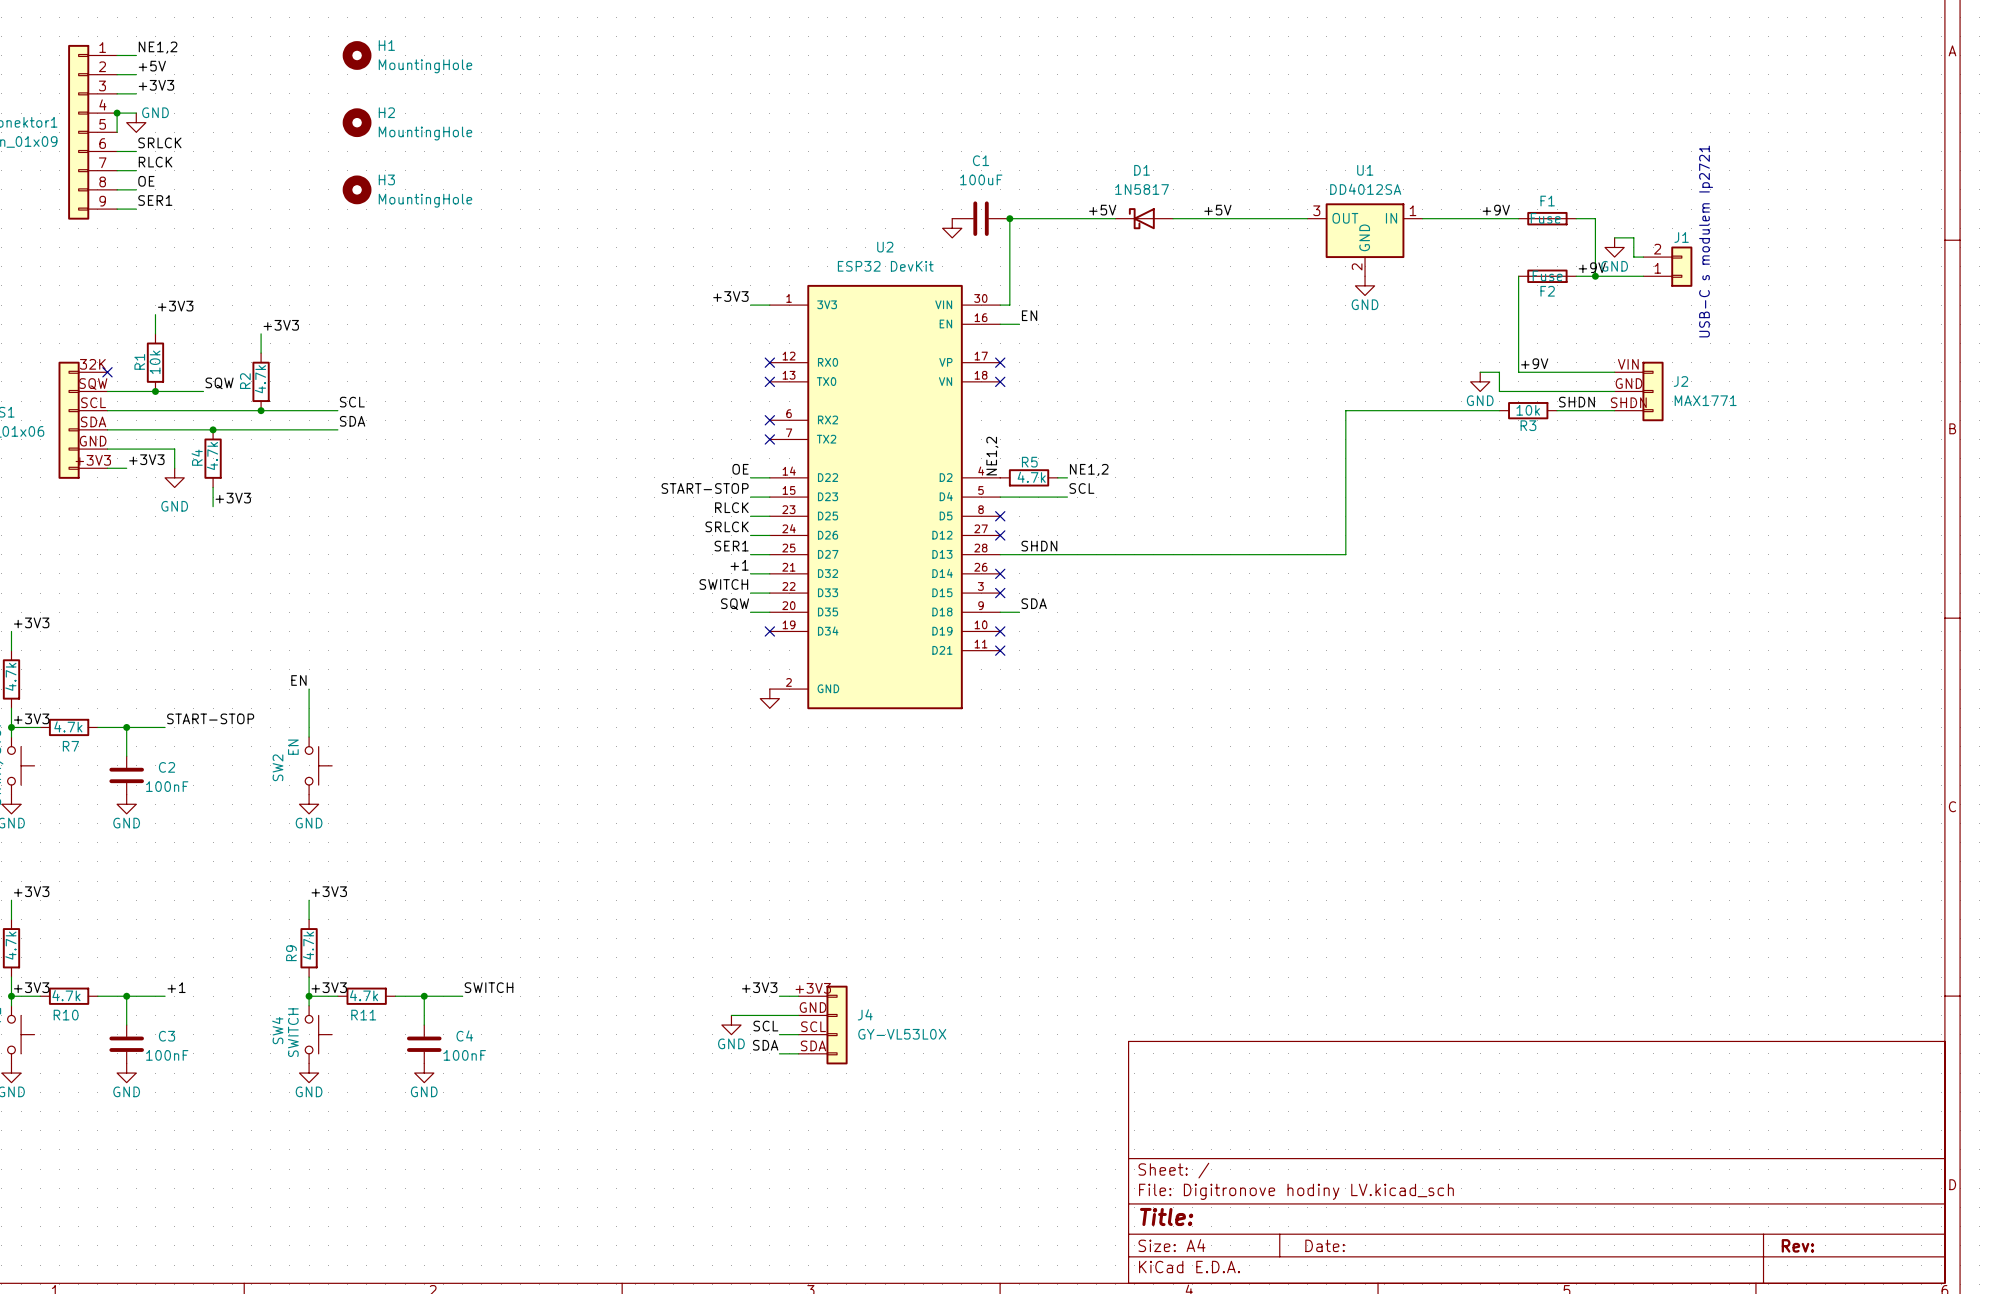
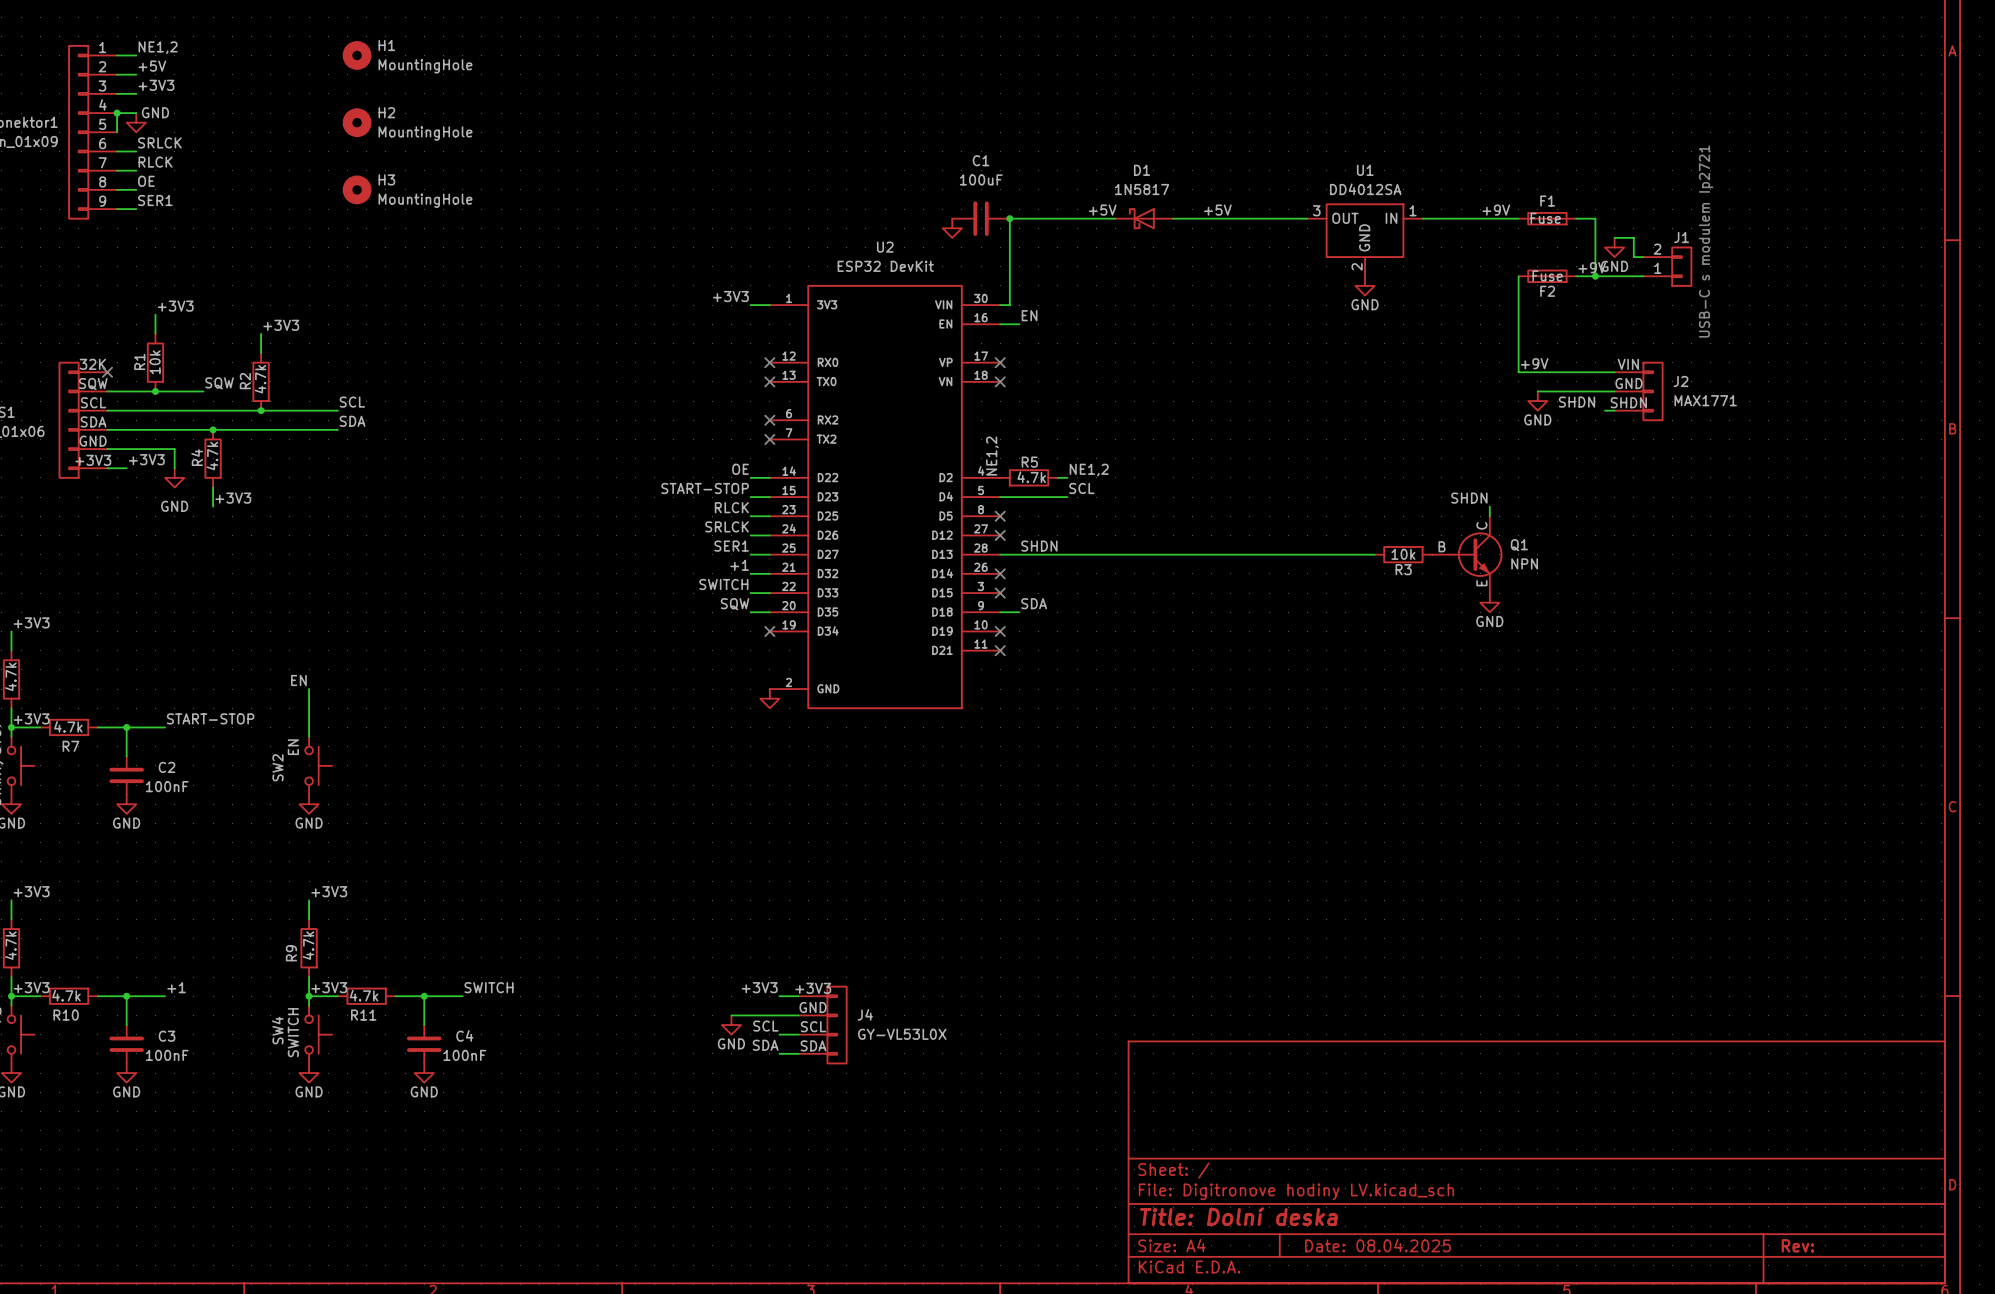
wire: (1480, 372) (1499, 372) (1499, 391) (1537, 391) -> none
power symbol position: GND (1480, 381) -> GND (1537, 401)
wire: (1499, 410) (1345, 410) (1345, 554) -> (1374, 554) (1345, 554)
R3 position: (1528, 410) -> (1403, 554)
wire: (1557, 410) (1605, 410) -> none
label: none -> SHDN (1469, 498)
wire: none -> (1489, 506) (1489, 516)
Q1: none -> NPN (1467, 554)
power symbol: none -> GND (1489, 602)
title block: Title: (1166, 1216) -> Title: Dolní deska (1238, 1216)
title block: Date: (1325, 1245) -> Date: 08.04.2025 (1377, 1245)

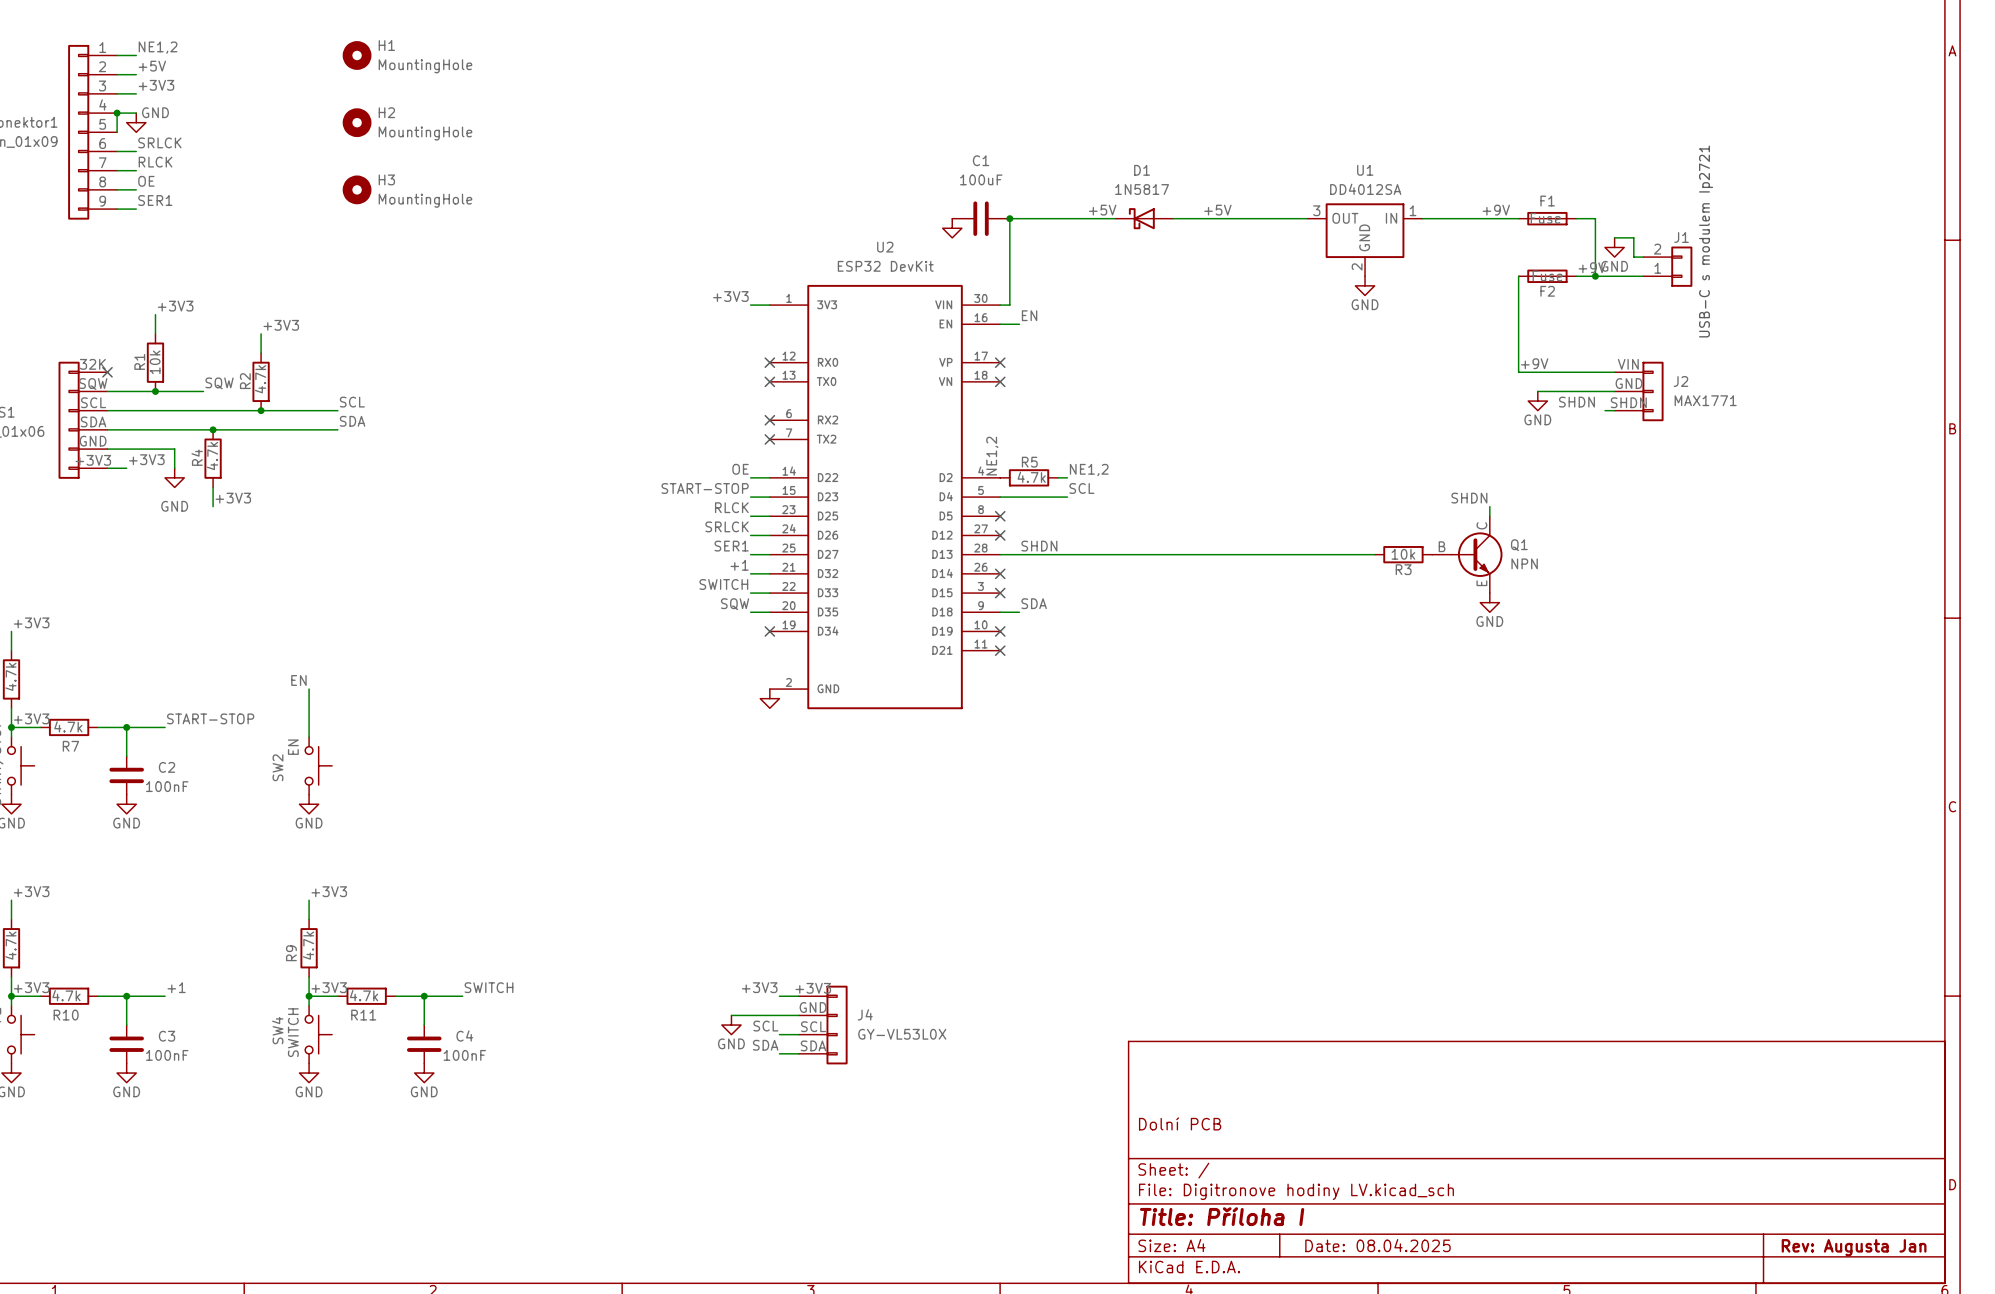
title block: none -> Dolní PCB (1180, 1123)
title block: Title: Dolní deska (1238, 1216) -> Title: Příloha I (1222, 1216)
title block: Rev: (1797, 1245) -> Rev: Augusta Jan (1854, 1247)

